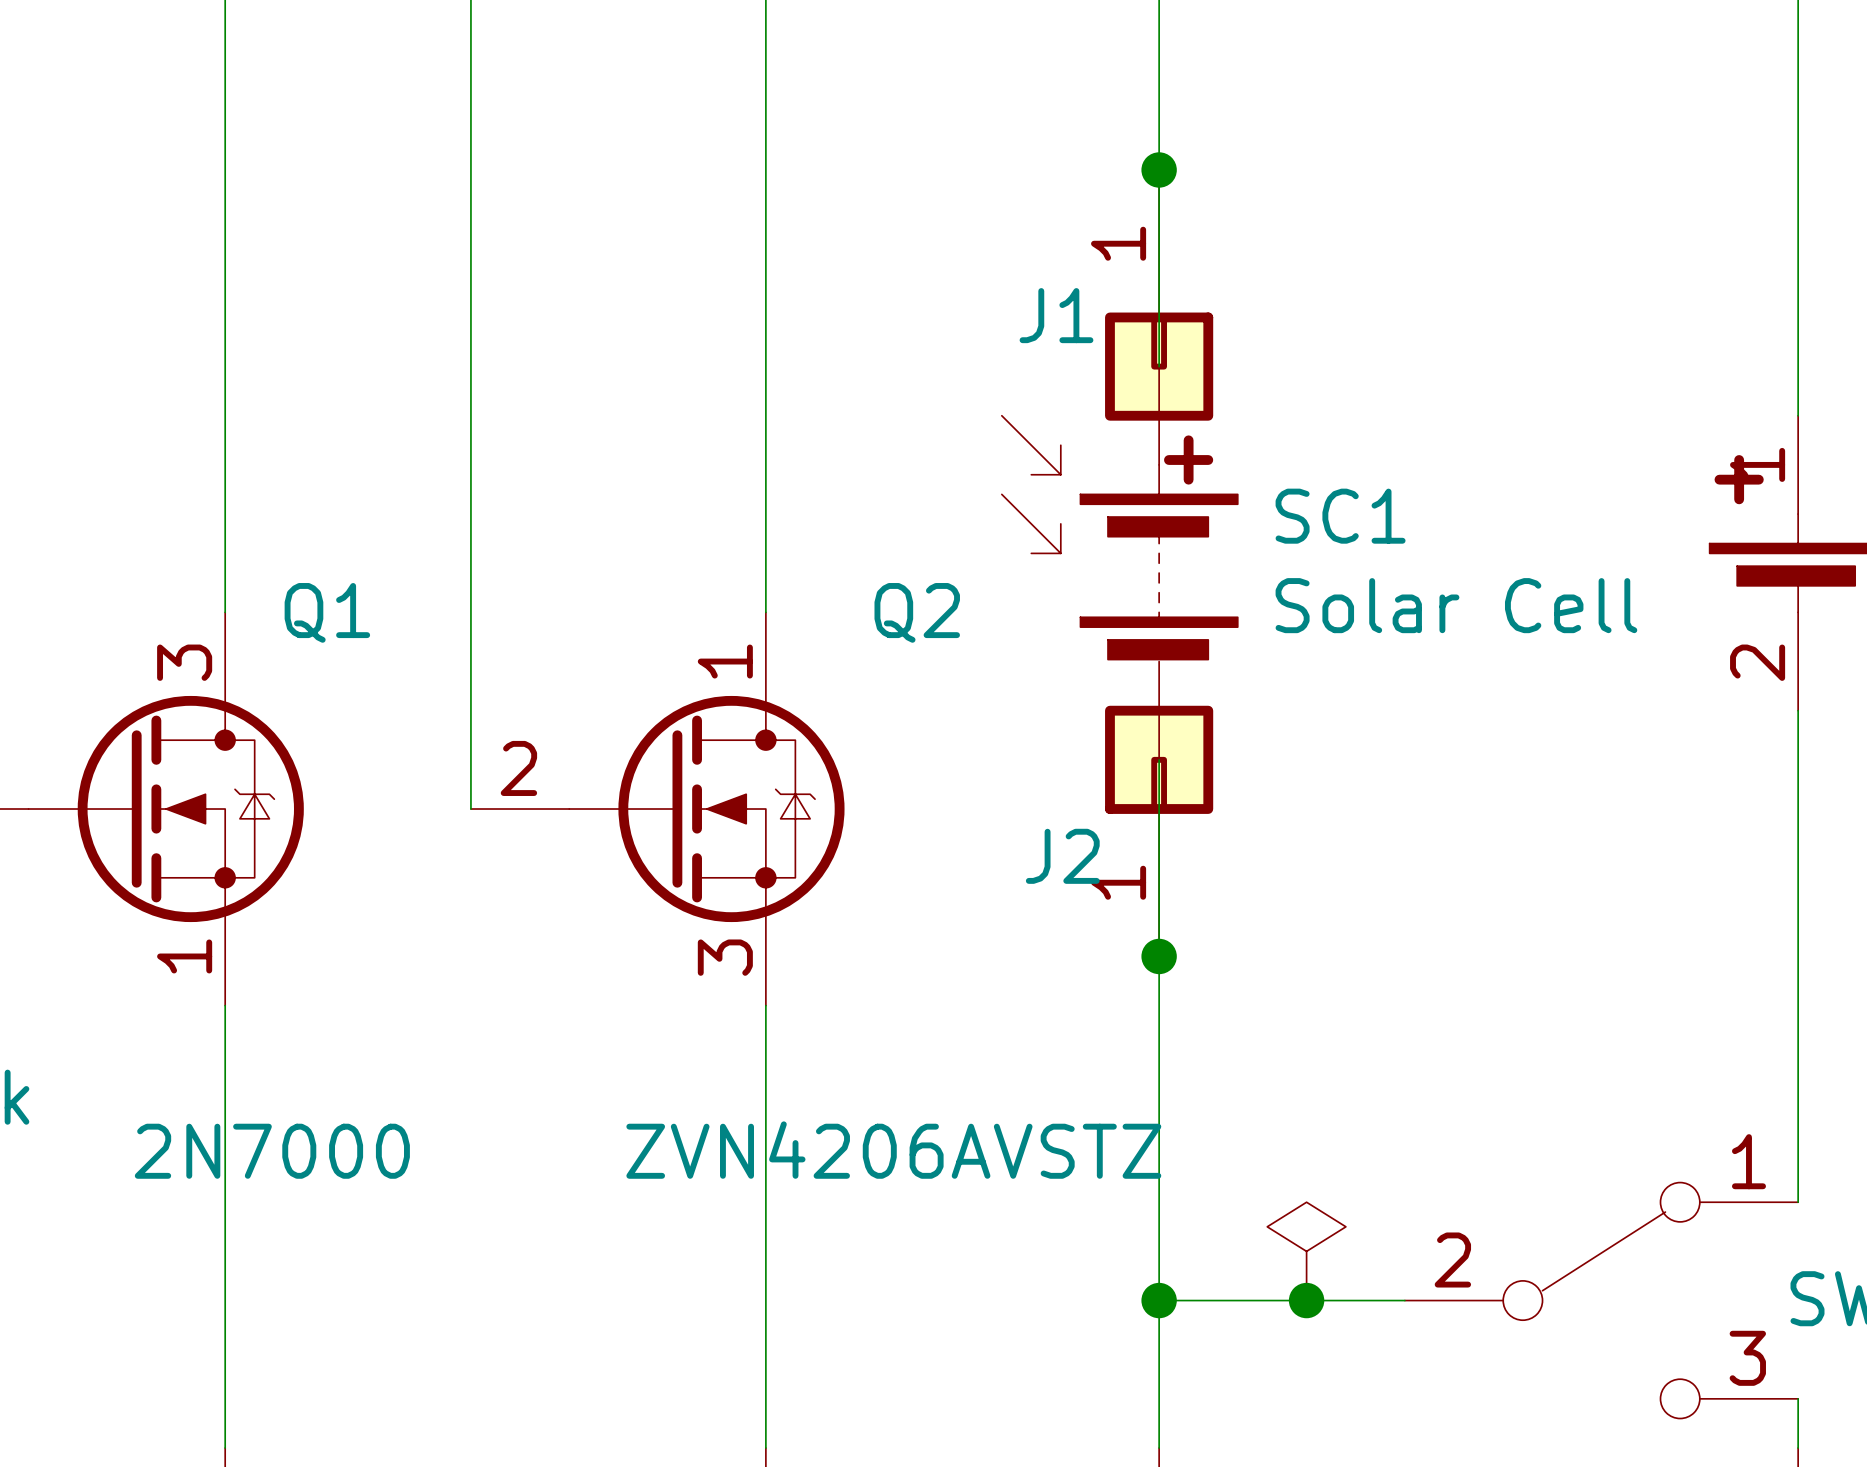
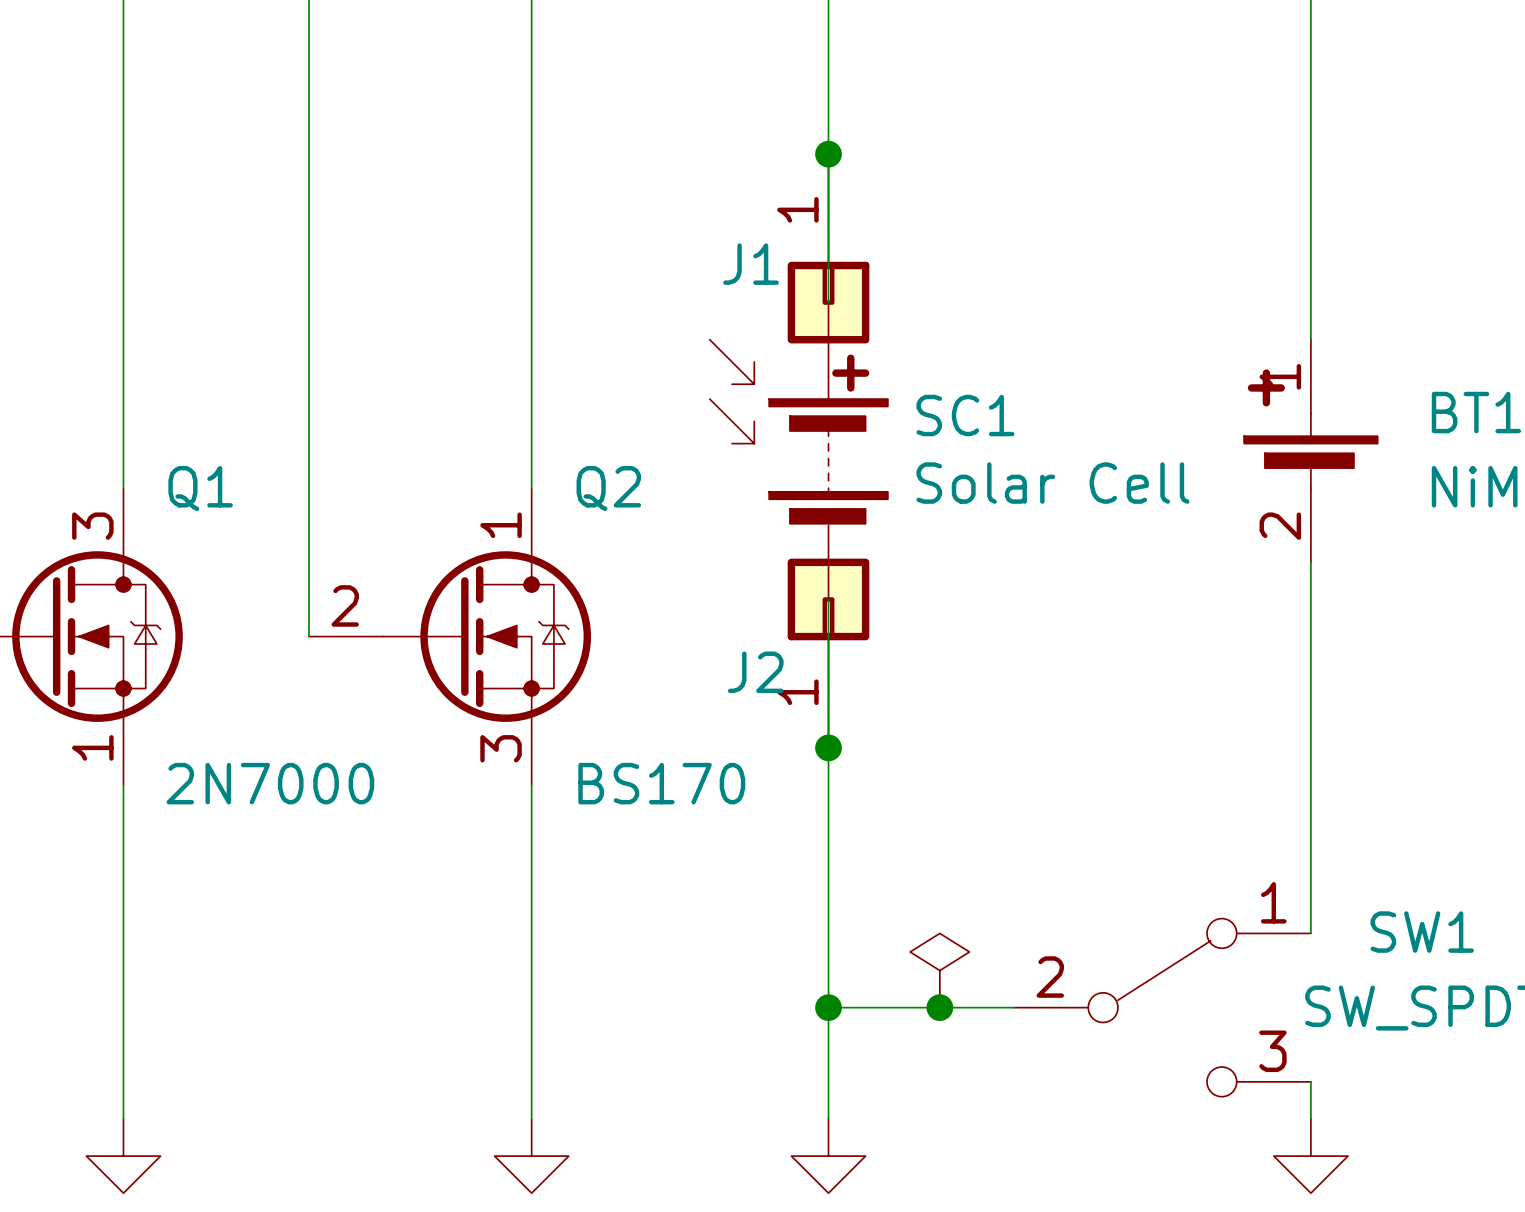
Q2 name position: Q2 (917, 612) -> Q2 (608, 488)
Q2 value: ZVN4206AVSTZ (893, 1150) -> BS170 (661, 783)
Q1 value position: 2N7000 (272, 1151) -> 2N7000 (270, 783)

